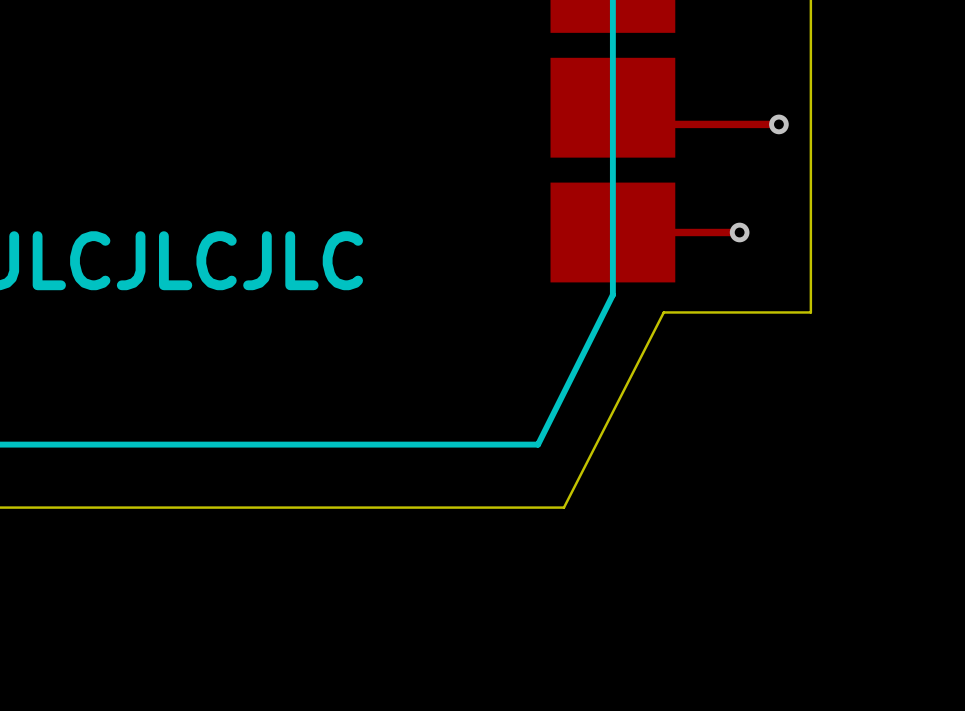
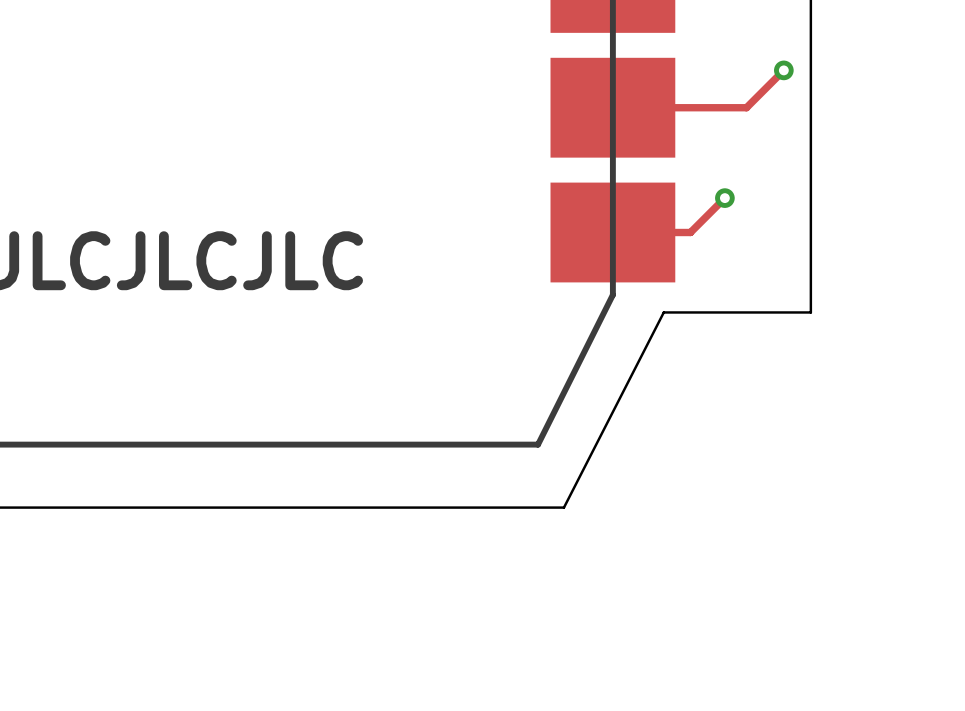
via: none -> (783, 70)
track: (612, 107) (629, 124) (778, 124) -> (612, 107) (746, 107) (783, 70)
via: (778, 124) -> none
track: (690, 232) (739, 232) -> (690, 232) (724, 198)
via position: (739, 232) -> (724, 198)

